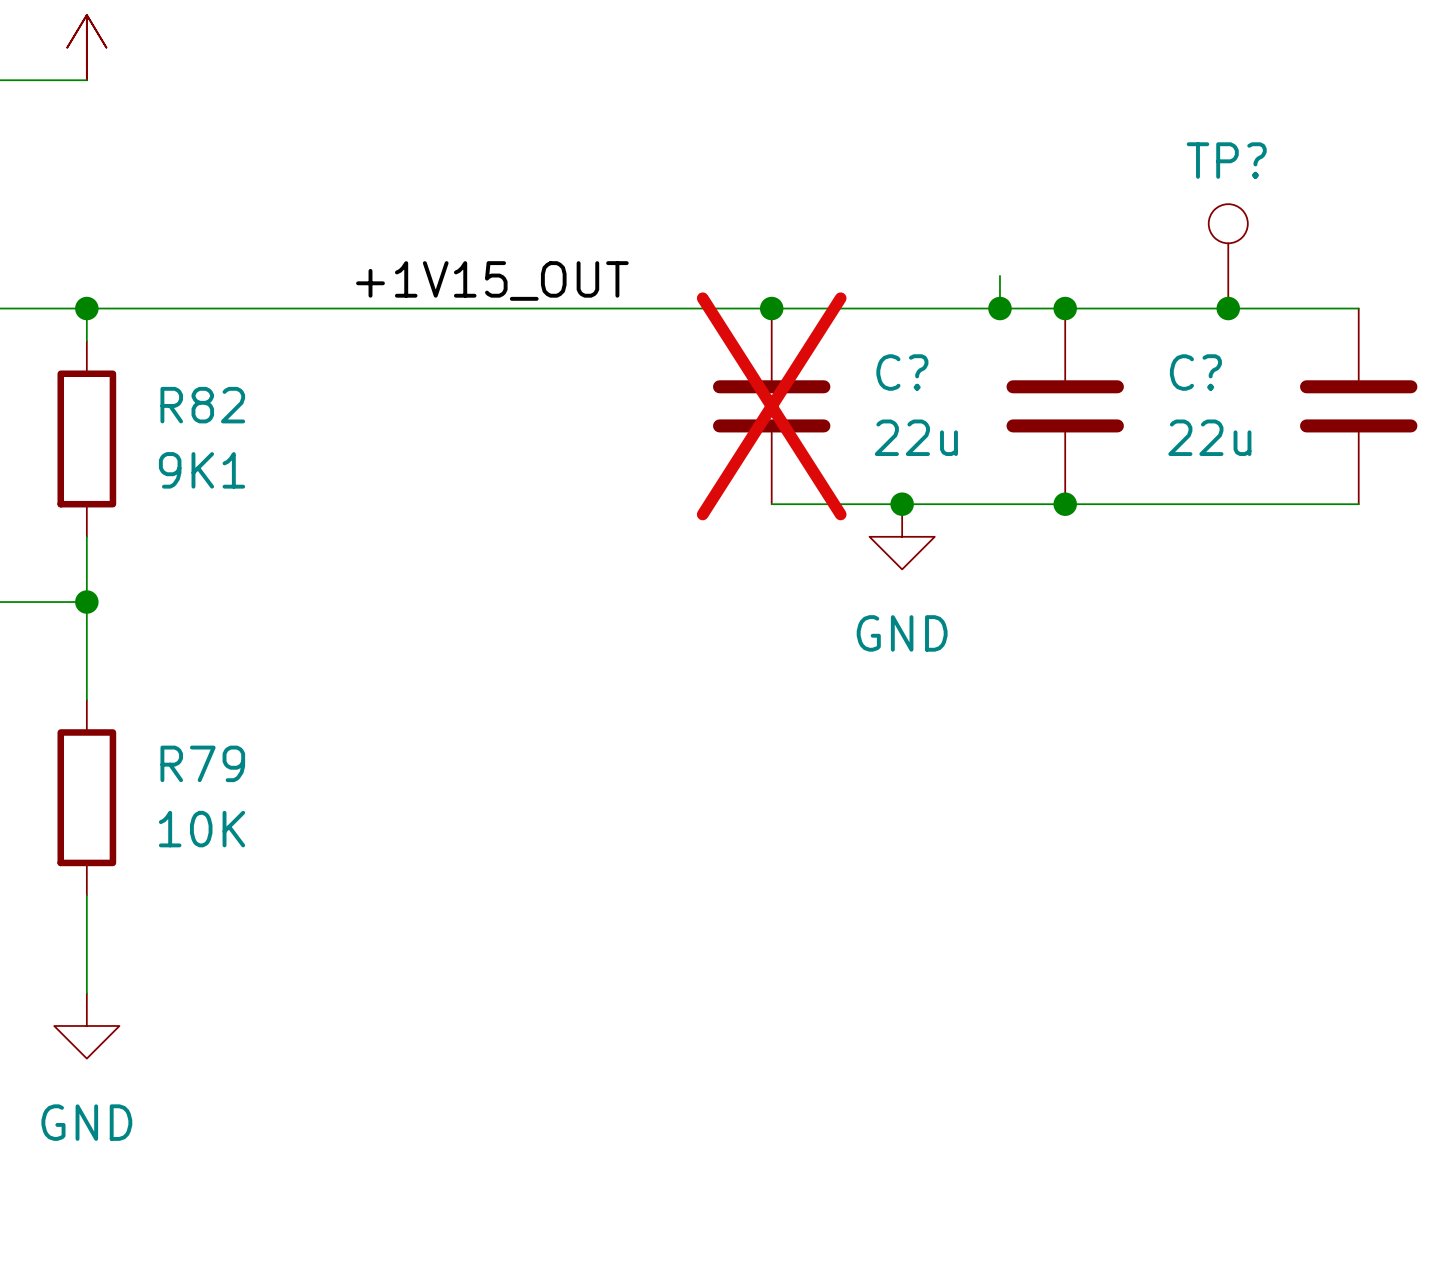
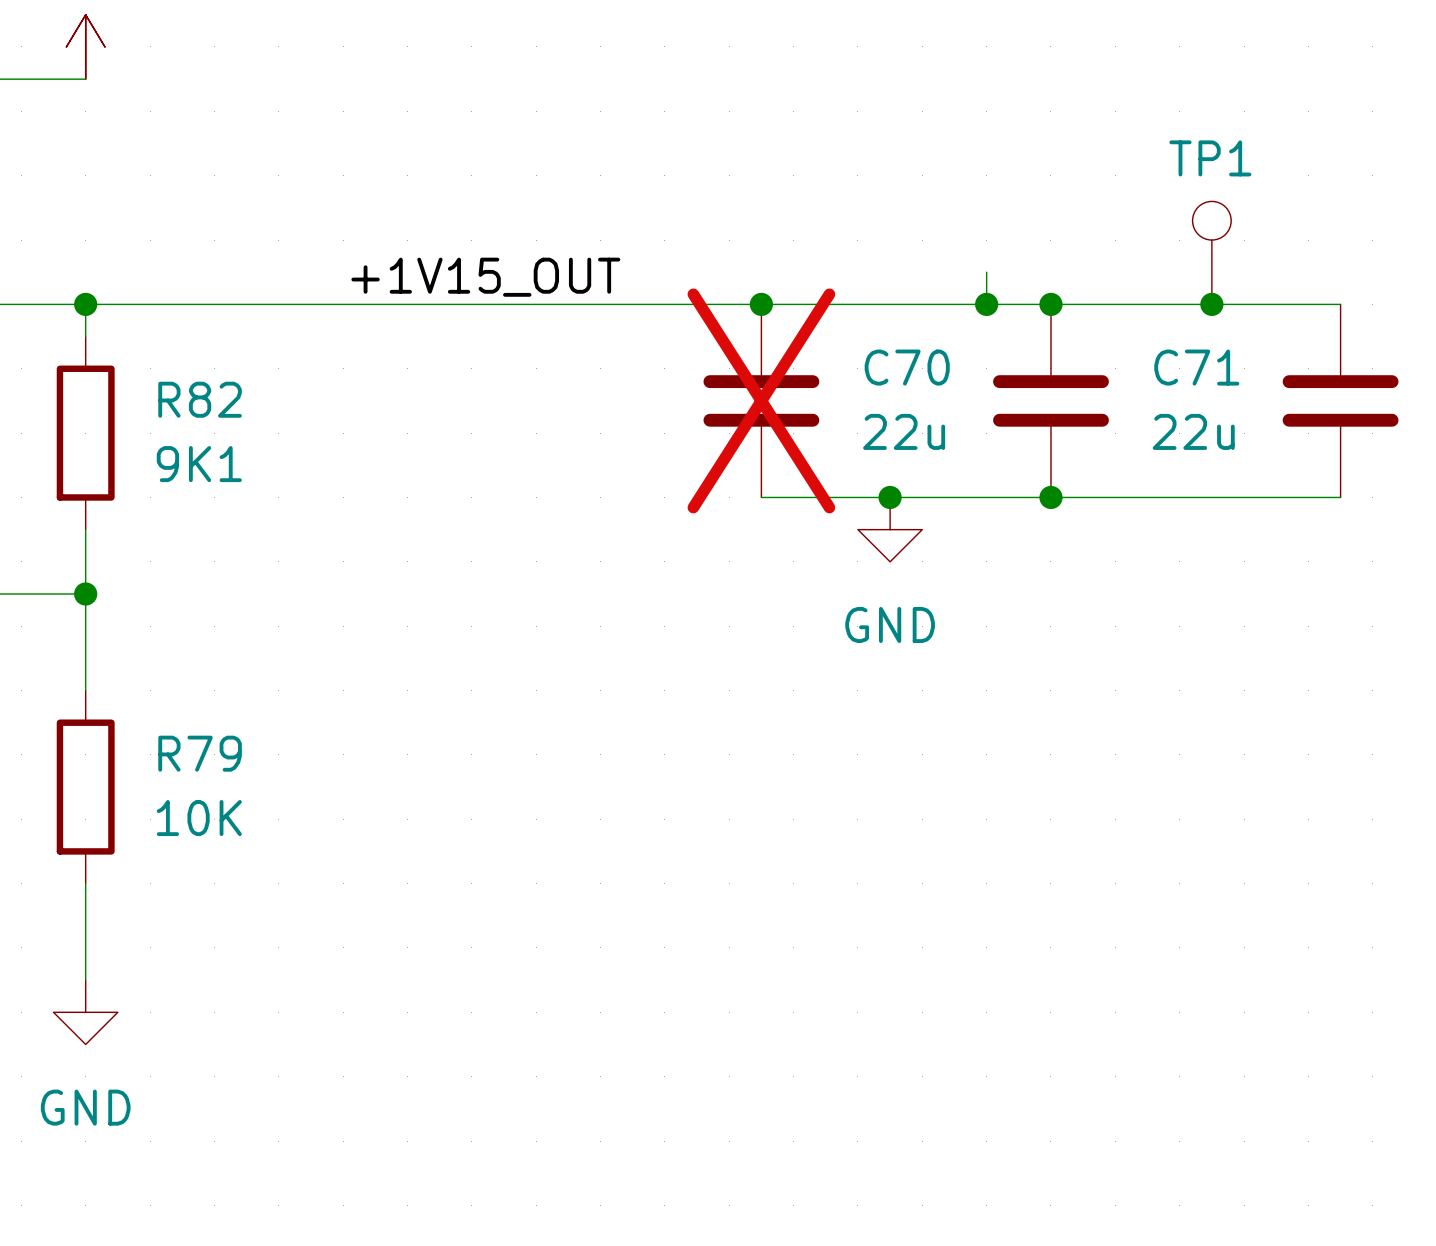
TP? name: TP? (1226, 160) -> TP1 (1210, 158)
C? name: C? (902, 372) -> C70 (907, 367)
C? name: C? (1195, 372) -> C71 (1196, 367)

